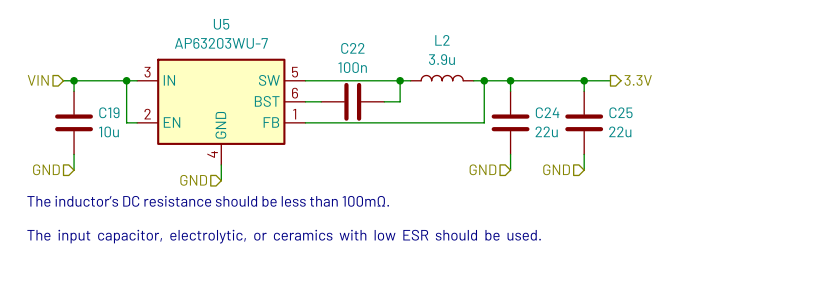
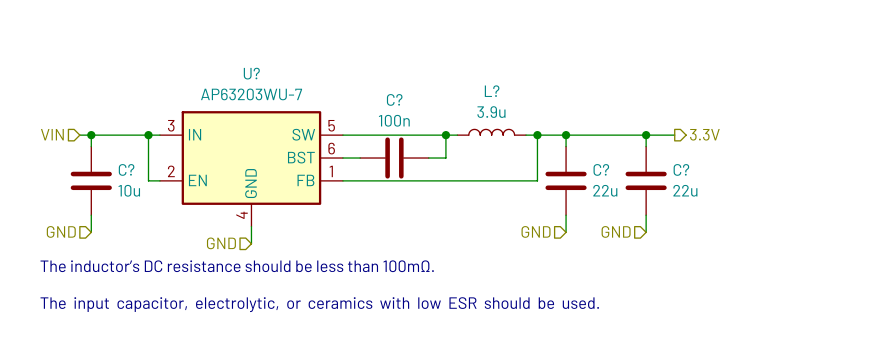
U5 name: U5 (221, 24) -> U? (251, 73)
L2 name: L2 (442, 40) -> L? (492, 91)
C22 name: C22 (352, 48) -> C? (394, 99)
C19 name: C19 (109, 112) -> C? (126, 169)
C24 name: C24 (547, 112) -> C? (601, 169)
C25 name: C25 (621, 112) -> C? (681, 169)

